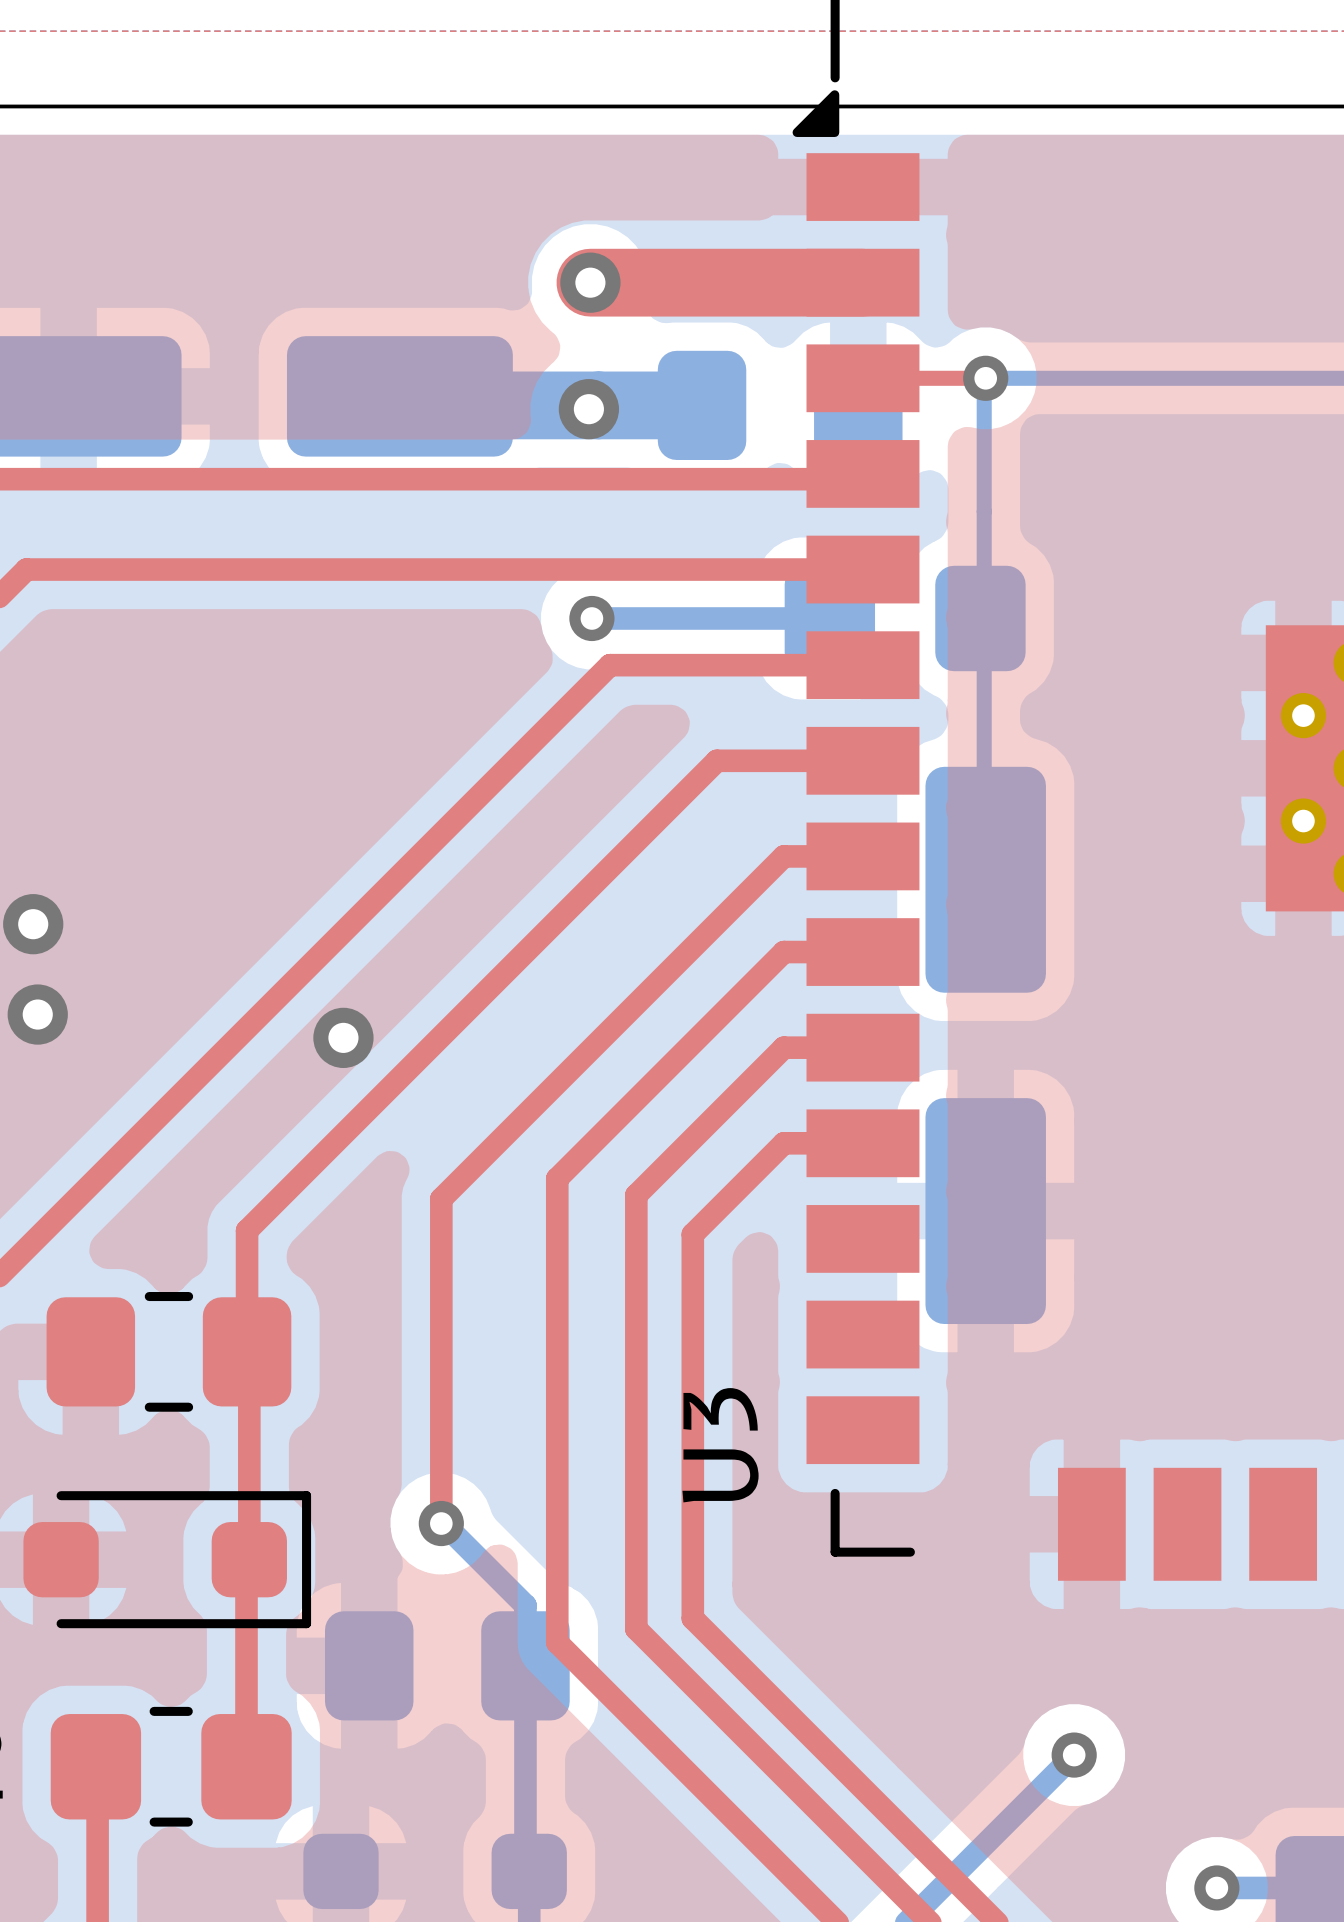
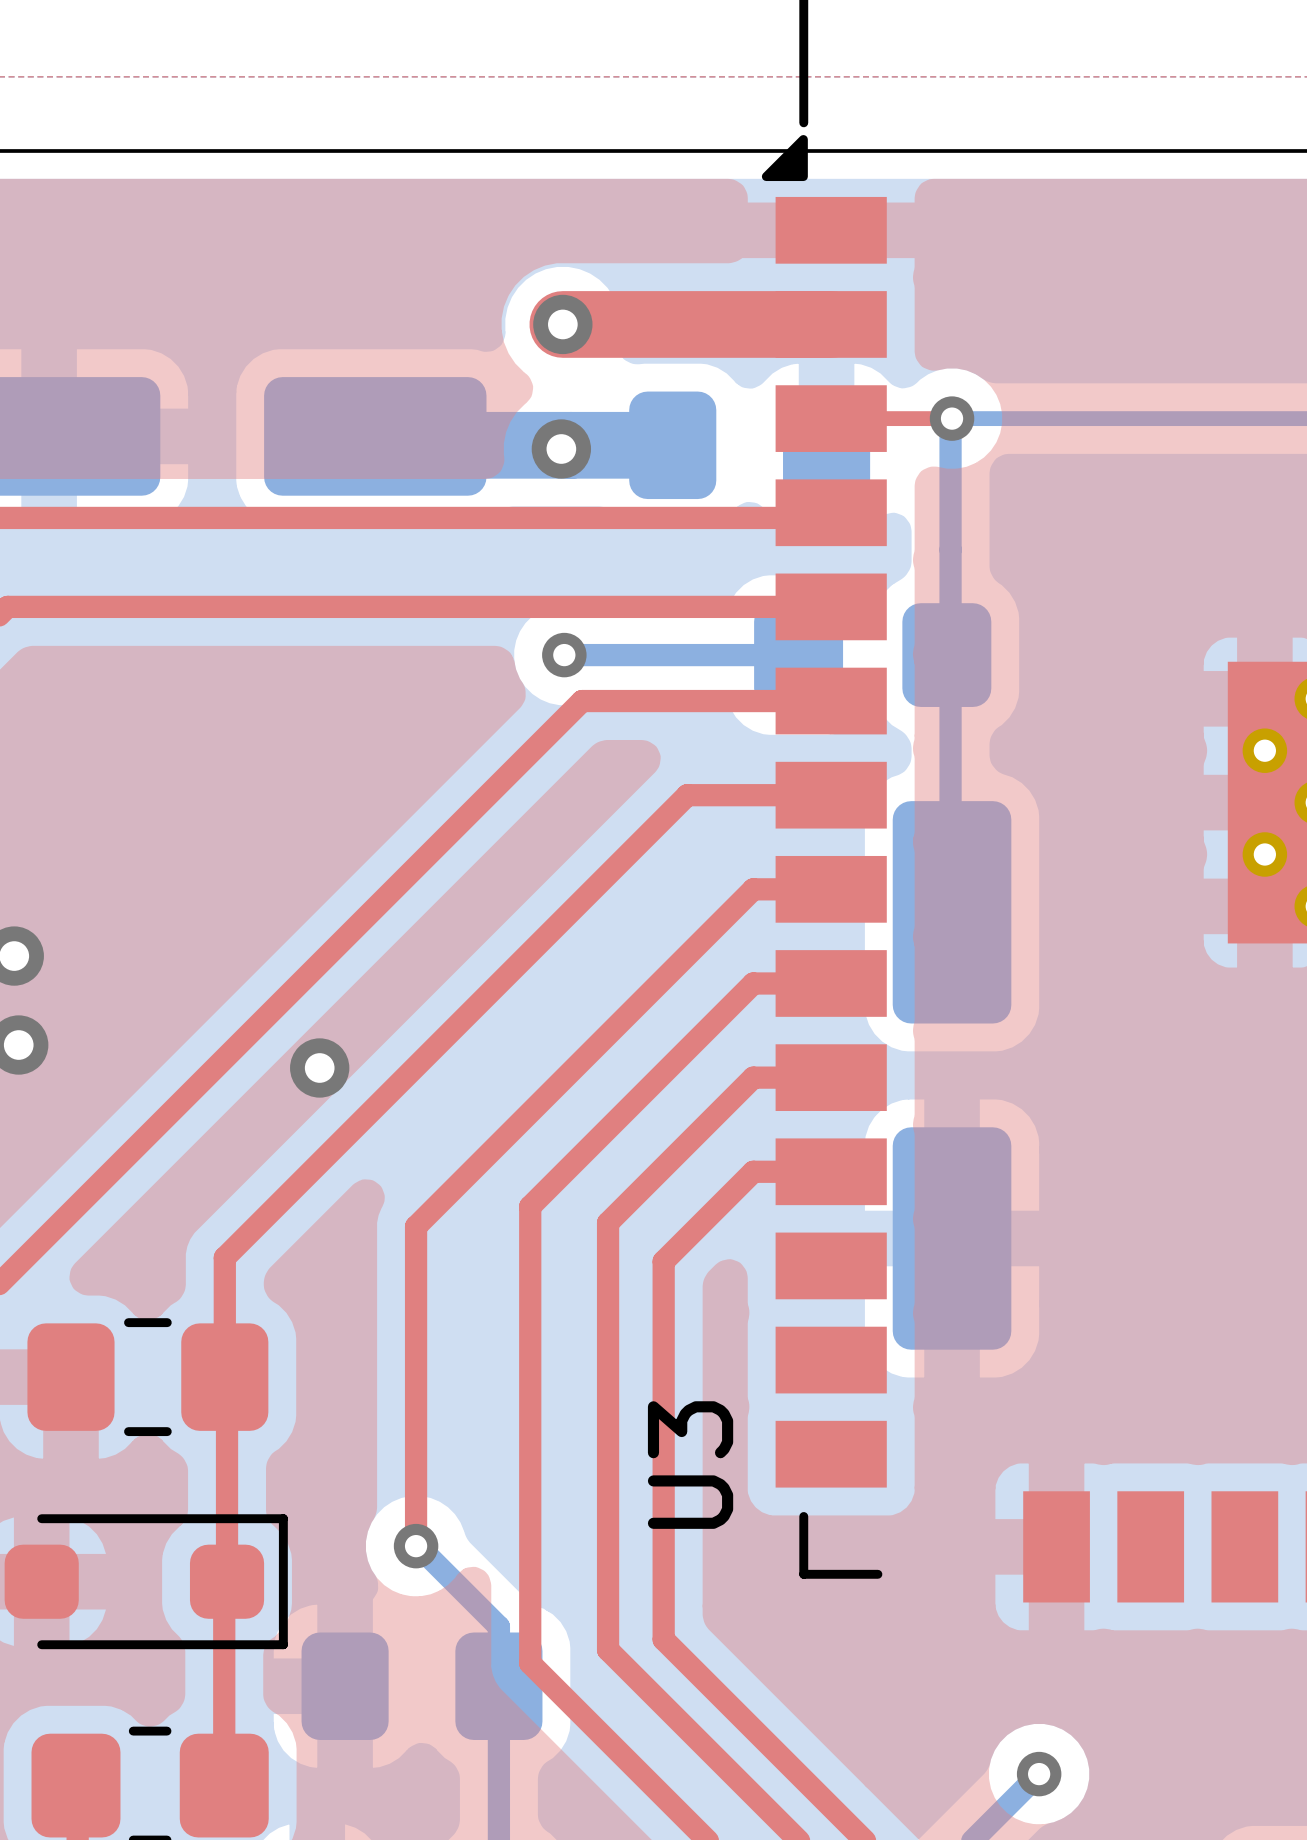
bottom track width: thin (985, 378) (984, 379) (984, 897) (995, 909) -> thick (952, 418) (950, 930) (961, 941)

